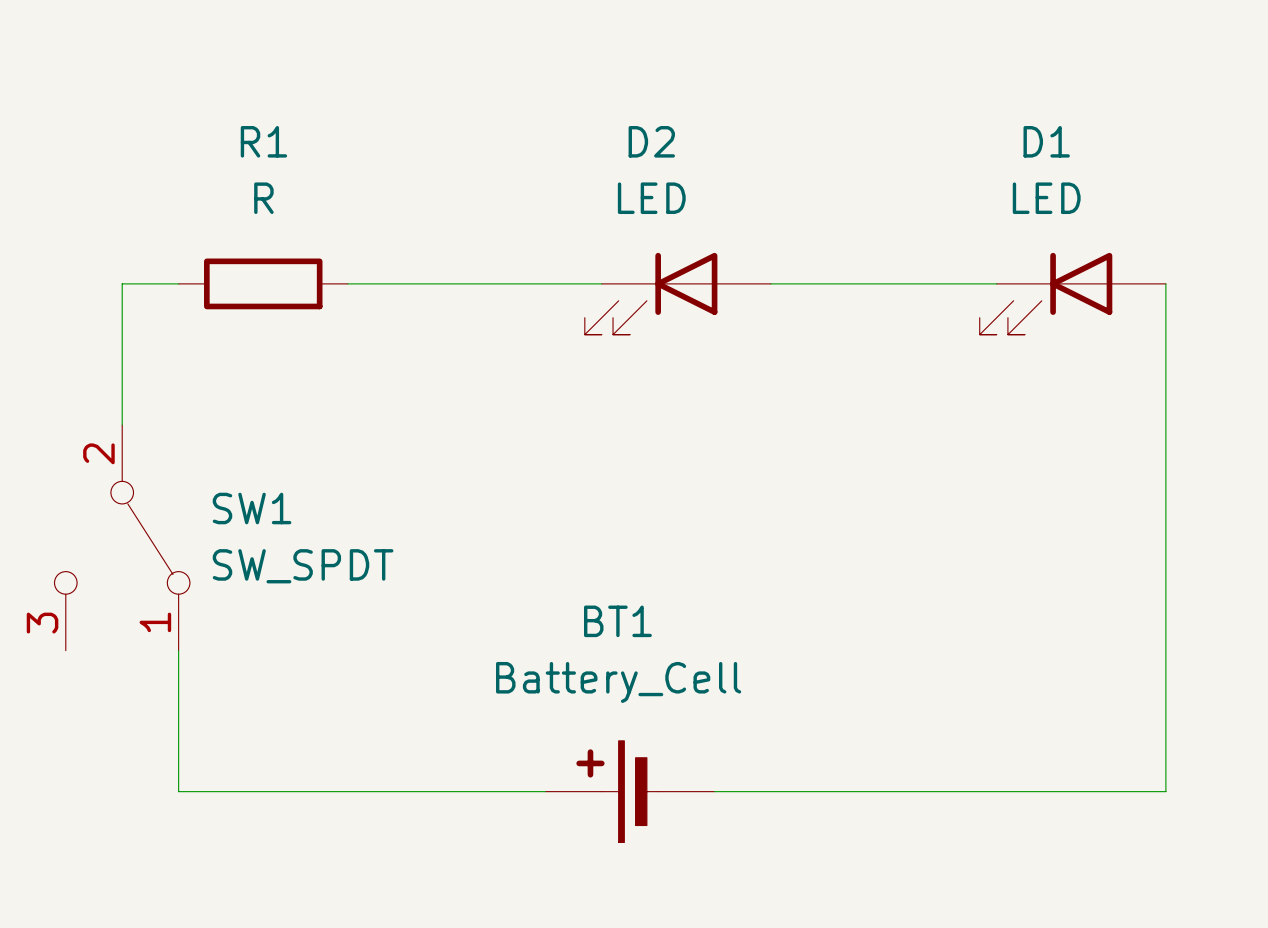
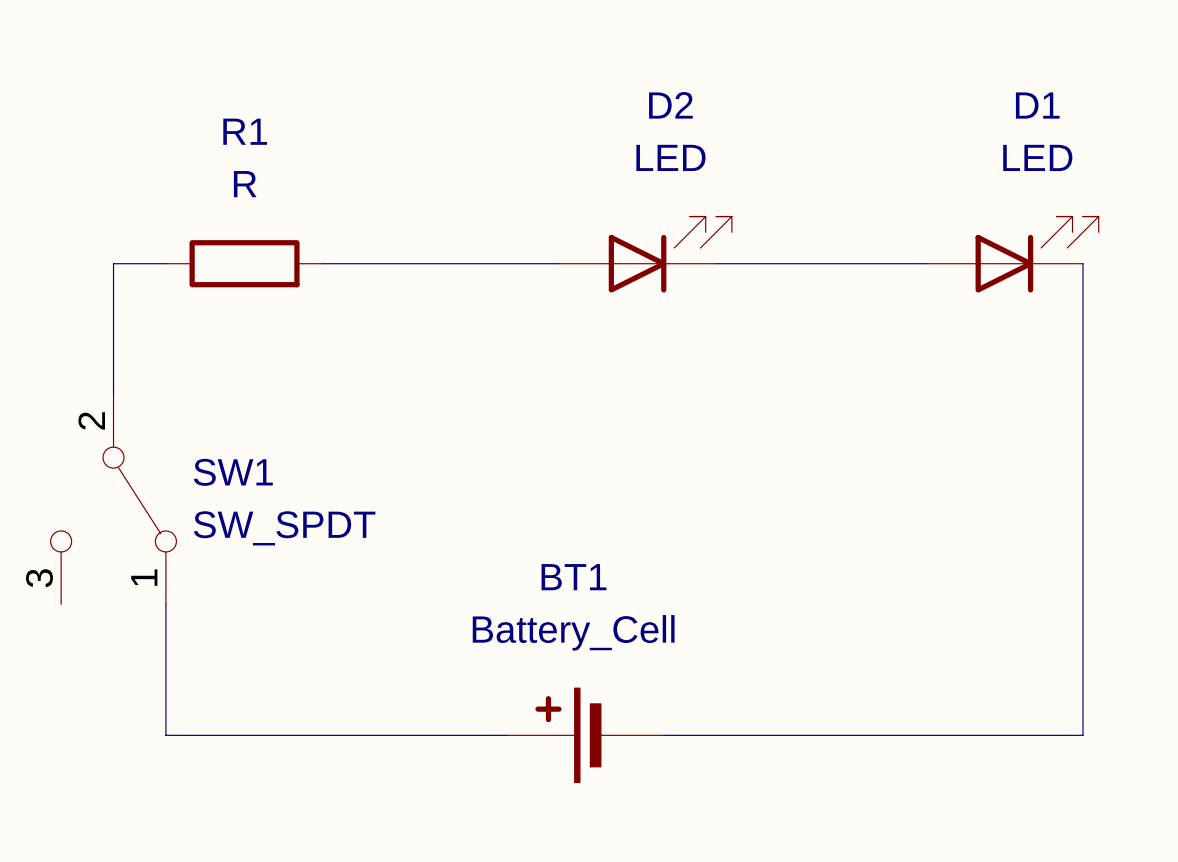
D2 name position: D2 (651, 141) -> D2 (670, 105)
D1 name position: D1 (1046, 141) -> D1 (1037, 105)
D2 value position: LED (651, 198) -> LED (670, 157)
D1 value position: LED (1046, 198) -> LED (1037, 157)
D2 rotation: 0° (651, 293) -> 180° (670, 254)
D1 rotation: 0° (1046, 293) -> 180° (1037, 254)

